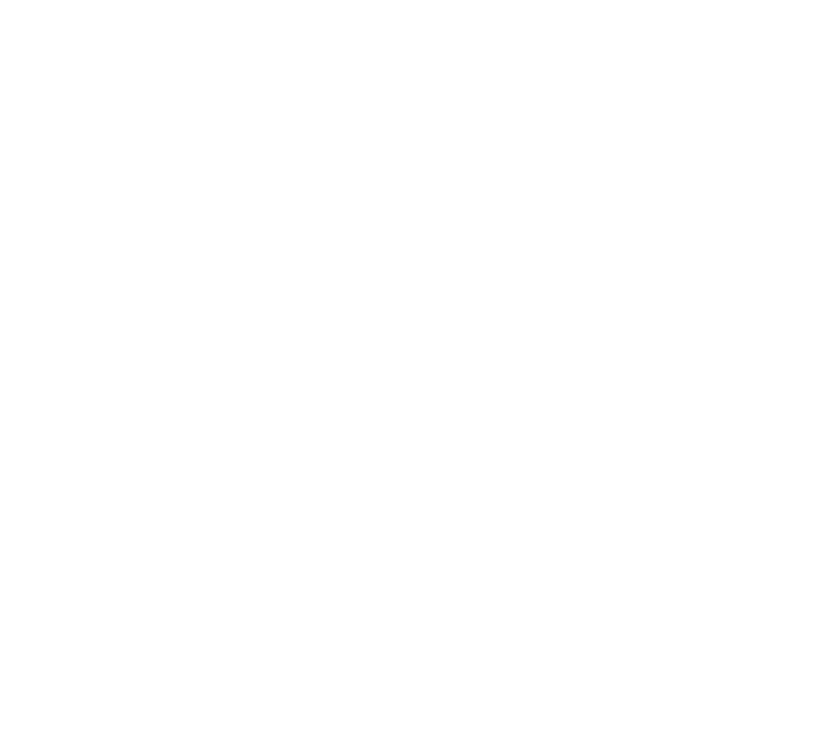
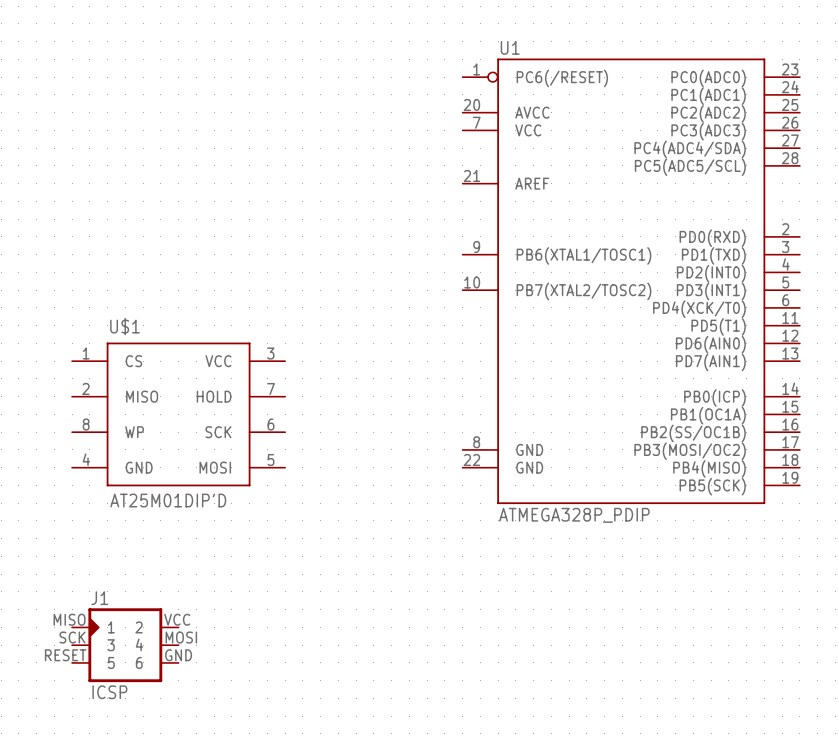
U1: none -> ATMEGA328P_PDIP (631, 281)
U$1: none -> AT25M01DIP'D (178, 414)
J1: none -> ICSP (125, 645)

